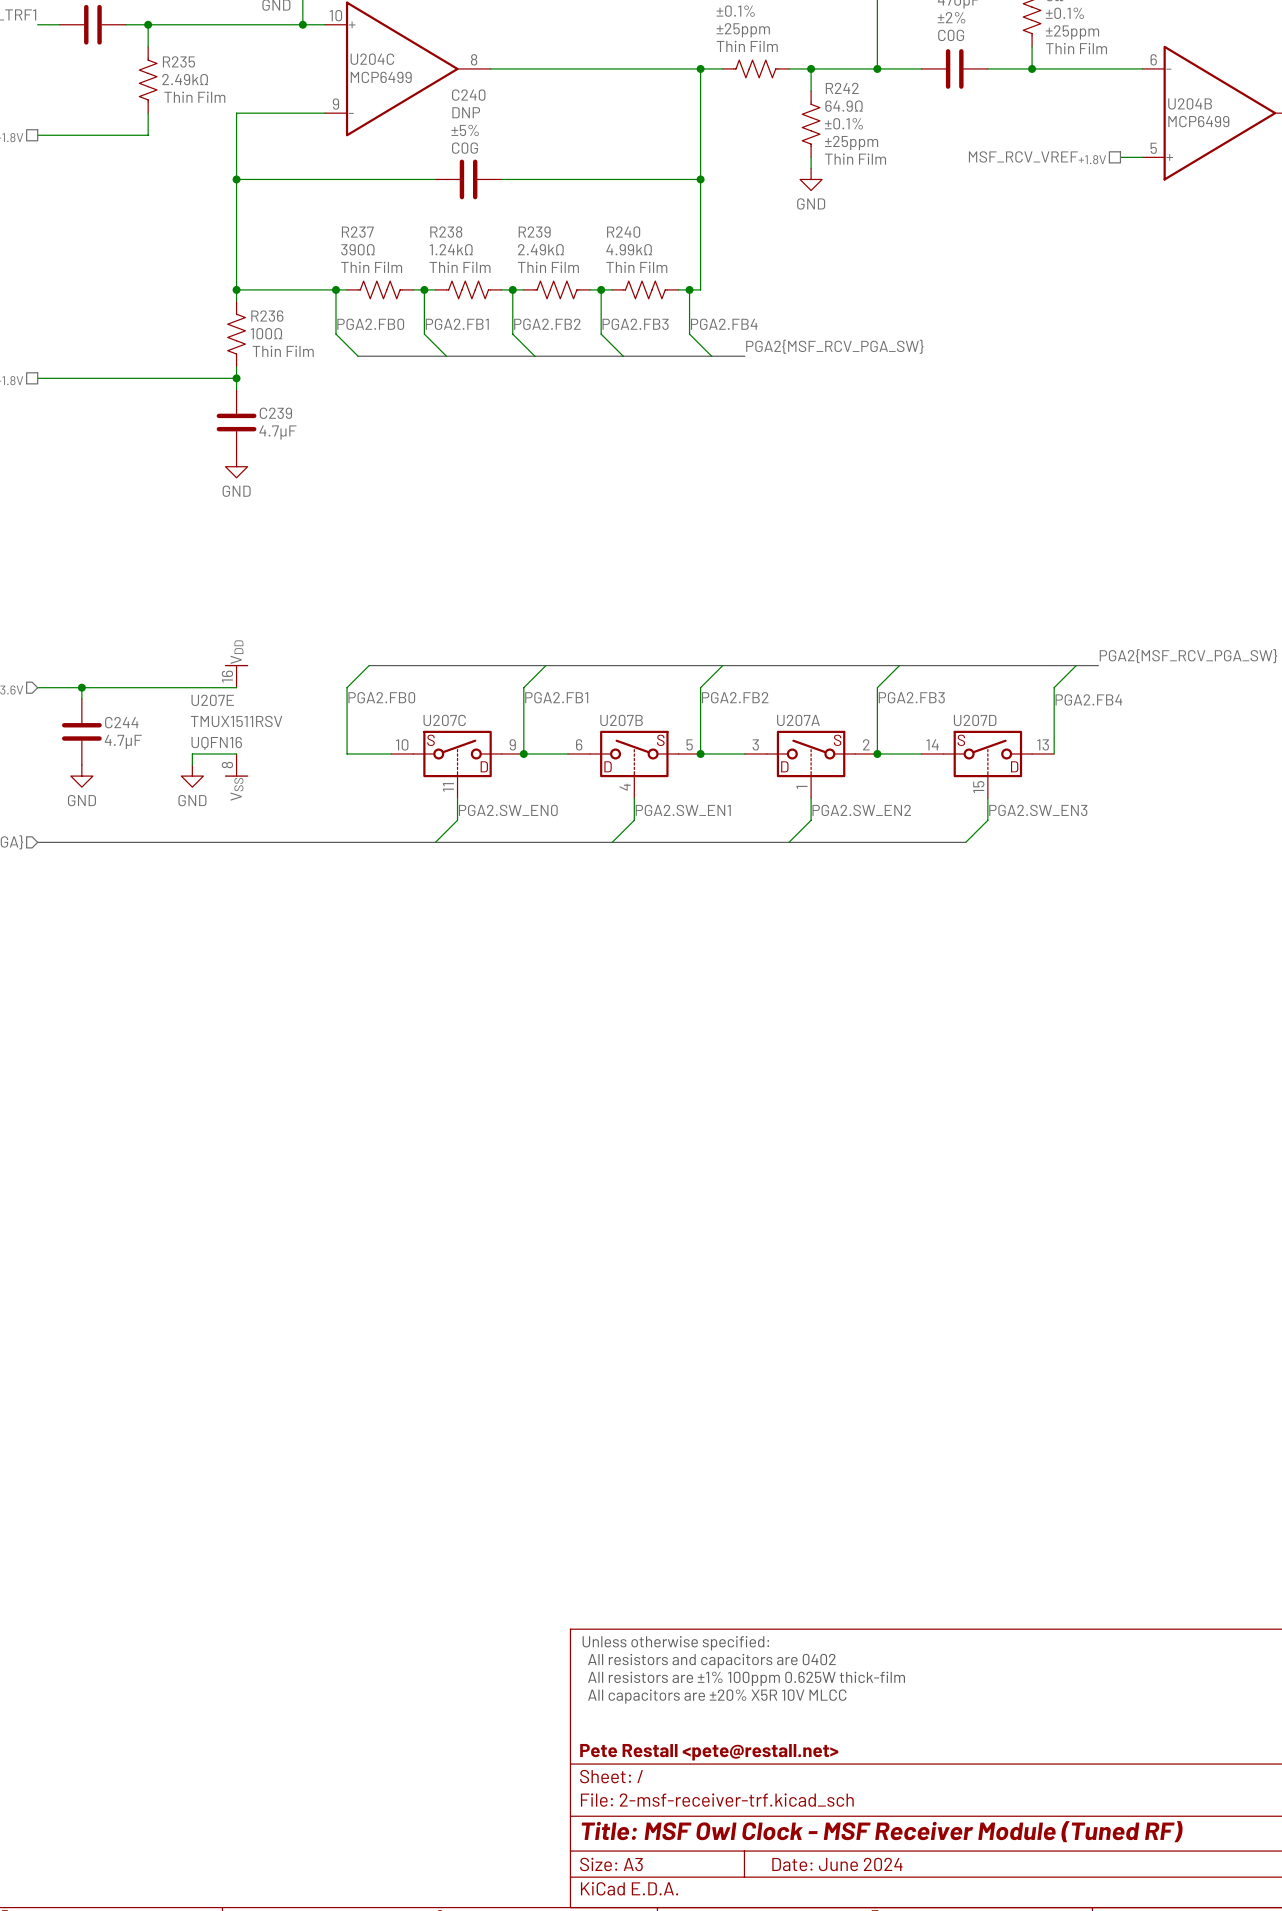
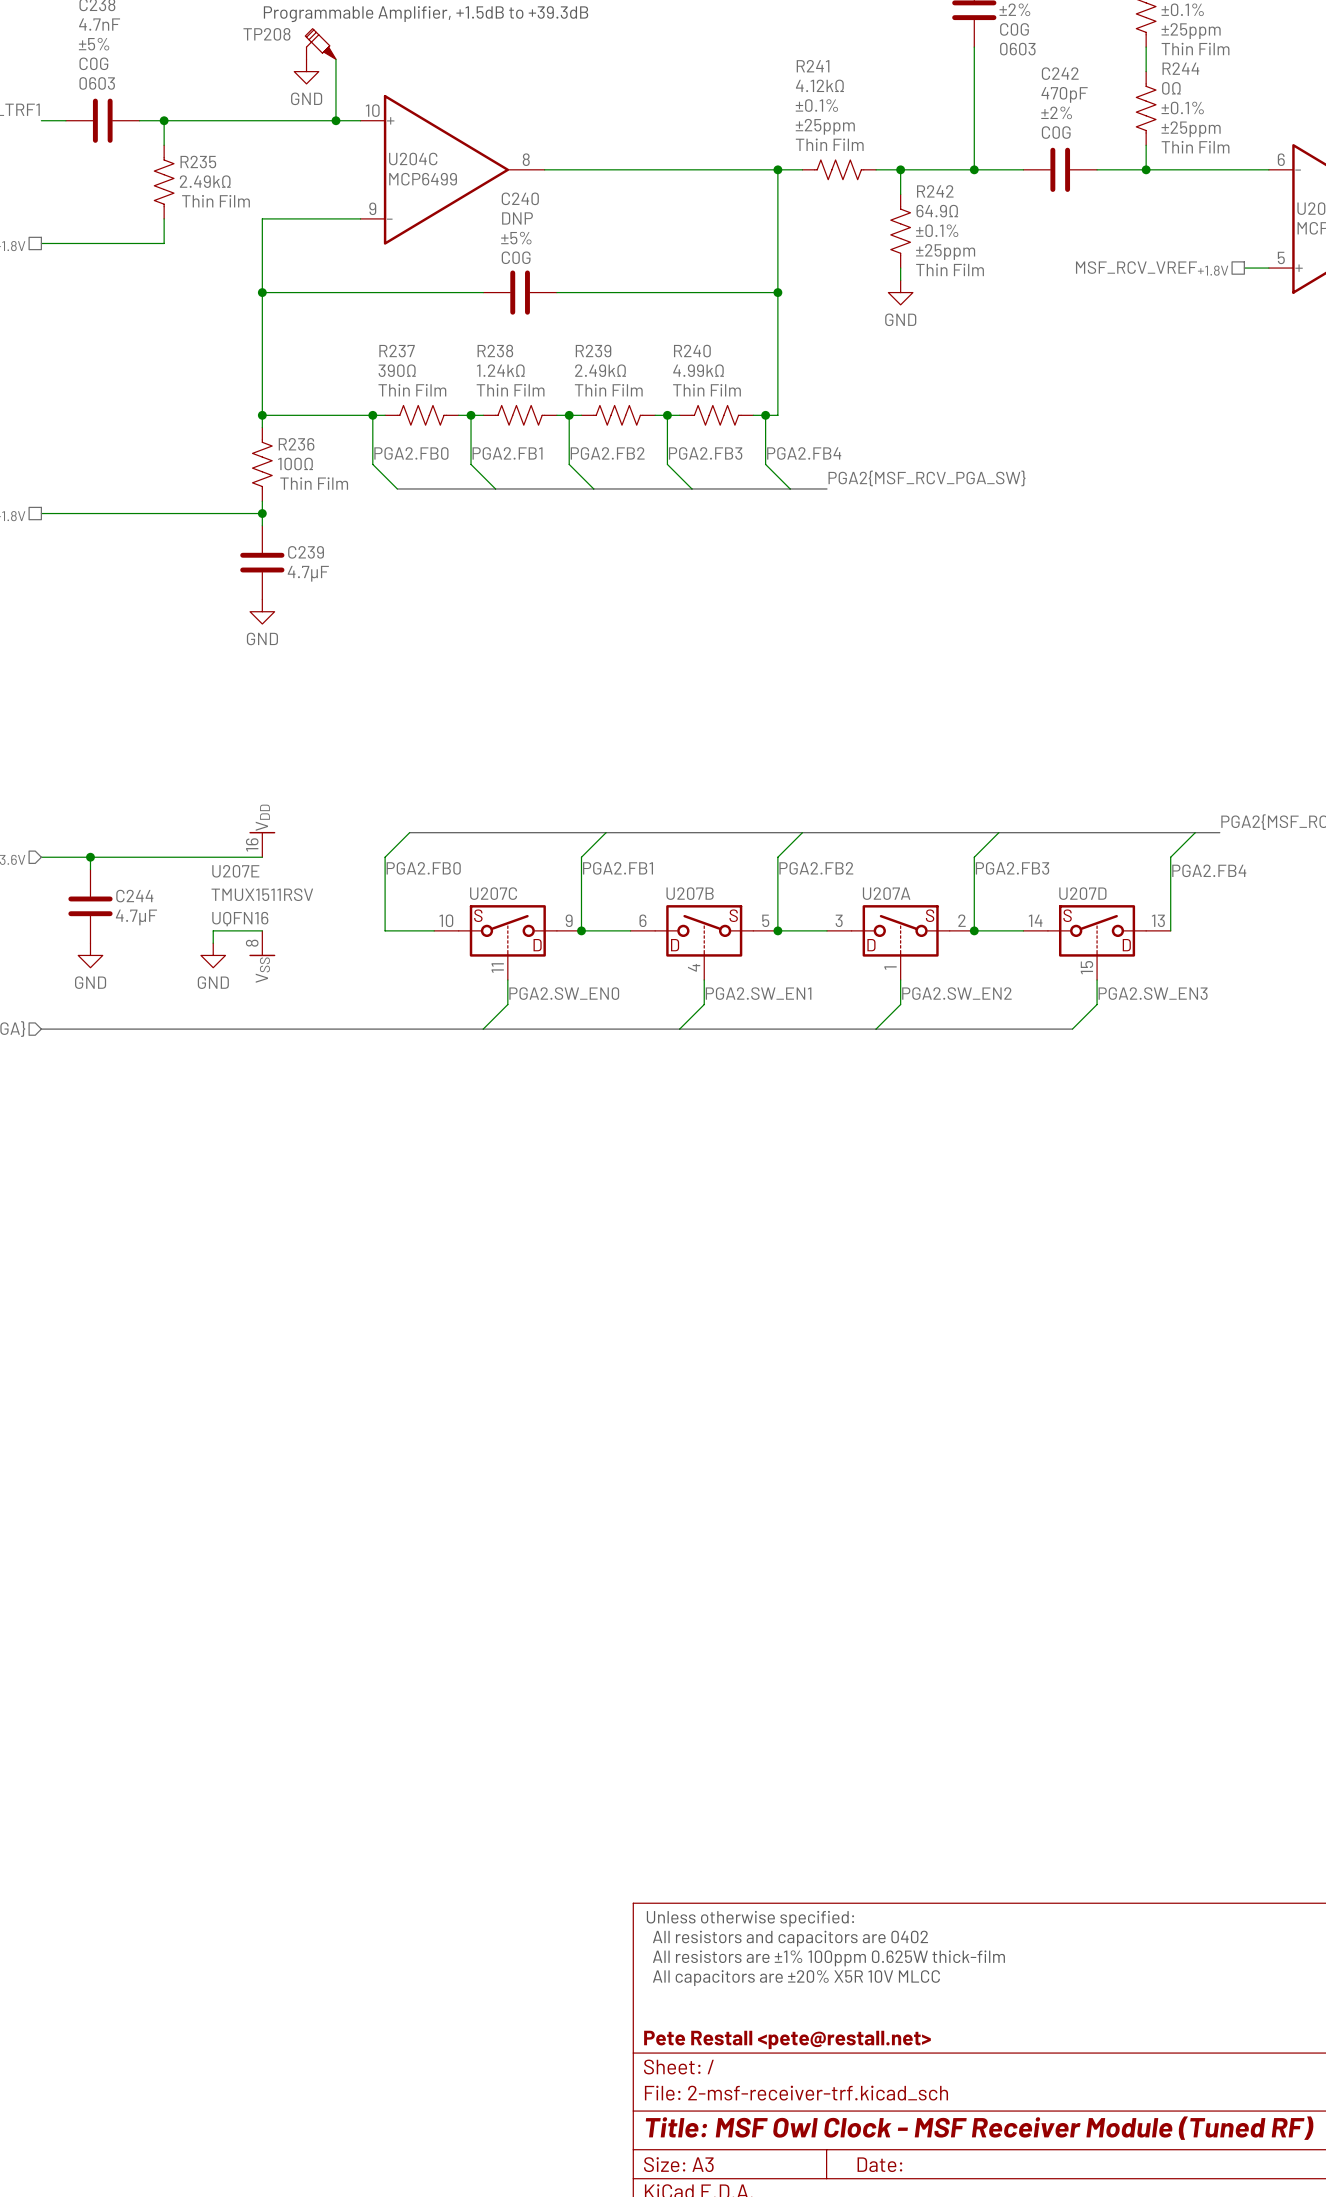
title block: Date: June 2024 (837, 1864) -> Date: (879, 2164)

